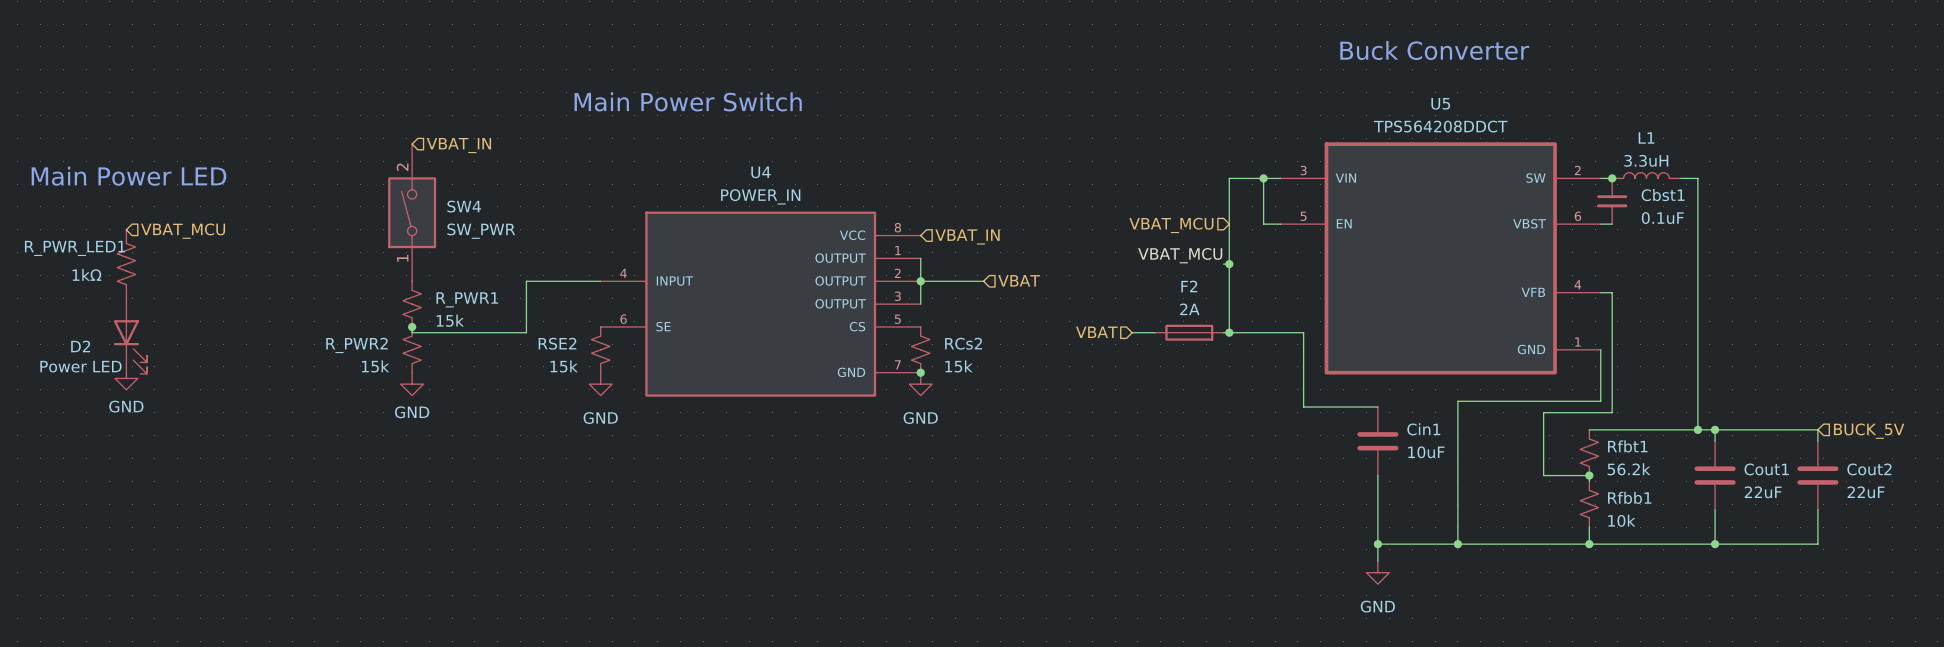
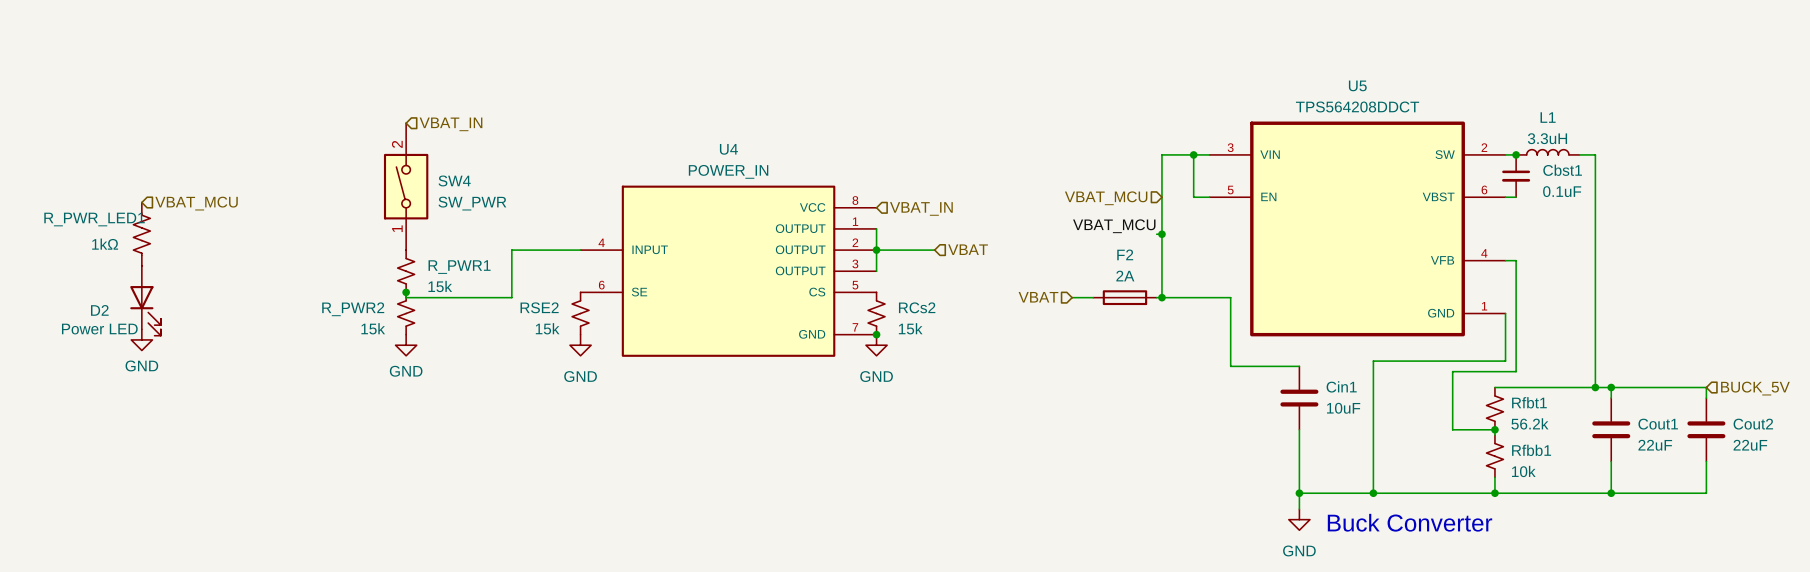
text: Buck Converter (1434, 50) -> none
text: Main Power Switch (688, 101) -> none
text: Main Power LED (128, 176) -> none
text: none -> Buck Converter (1410, 522)

